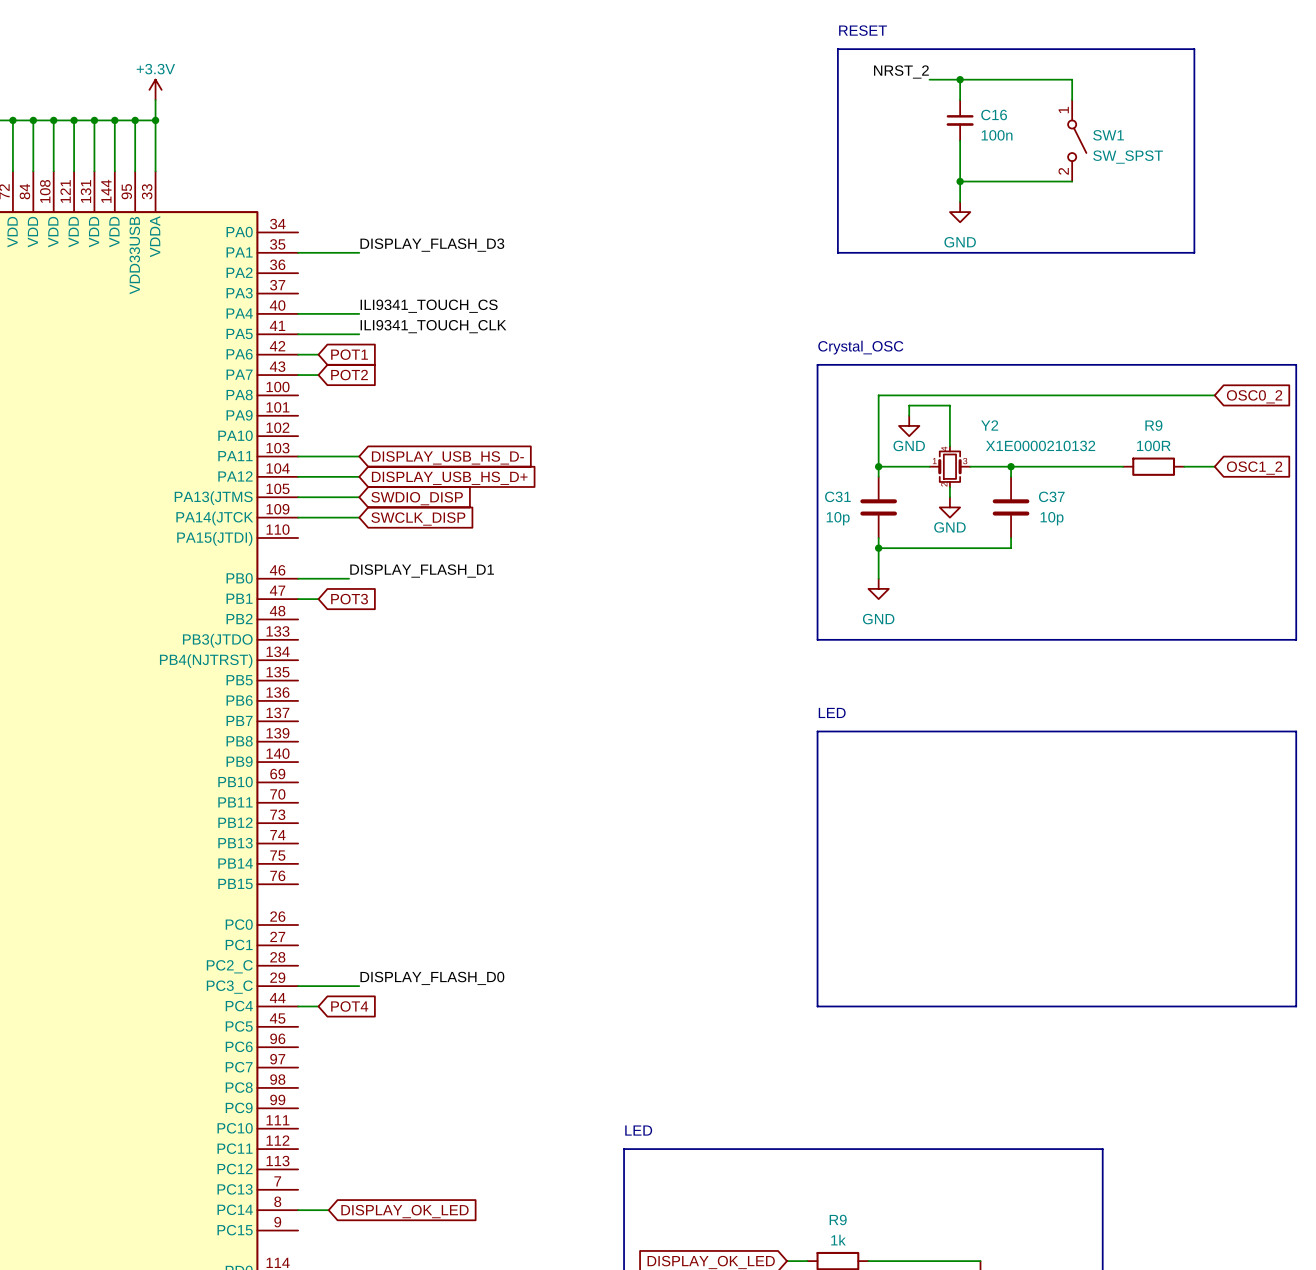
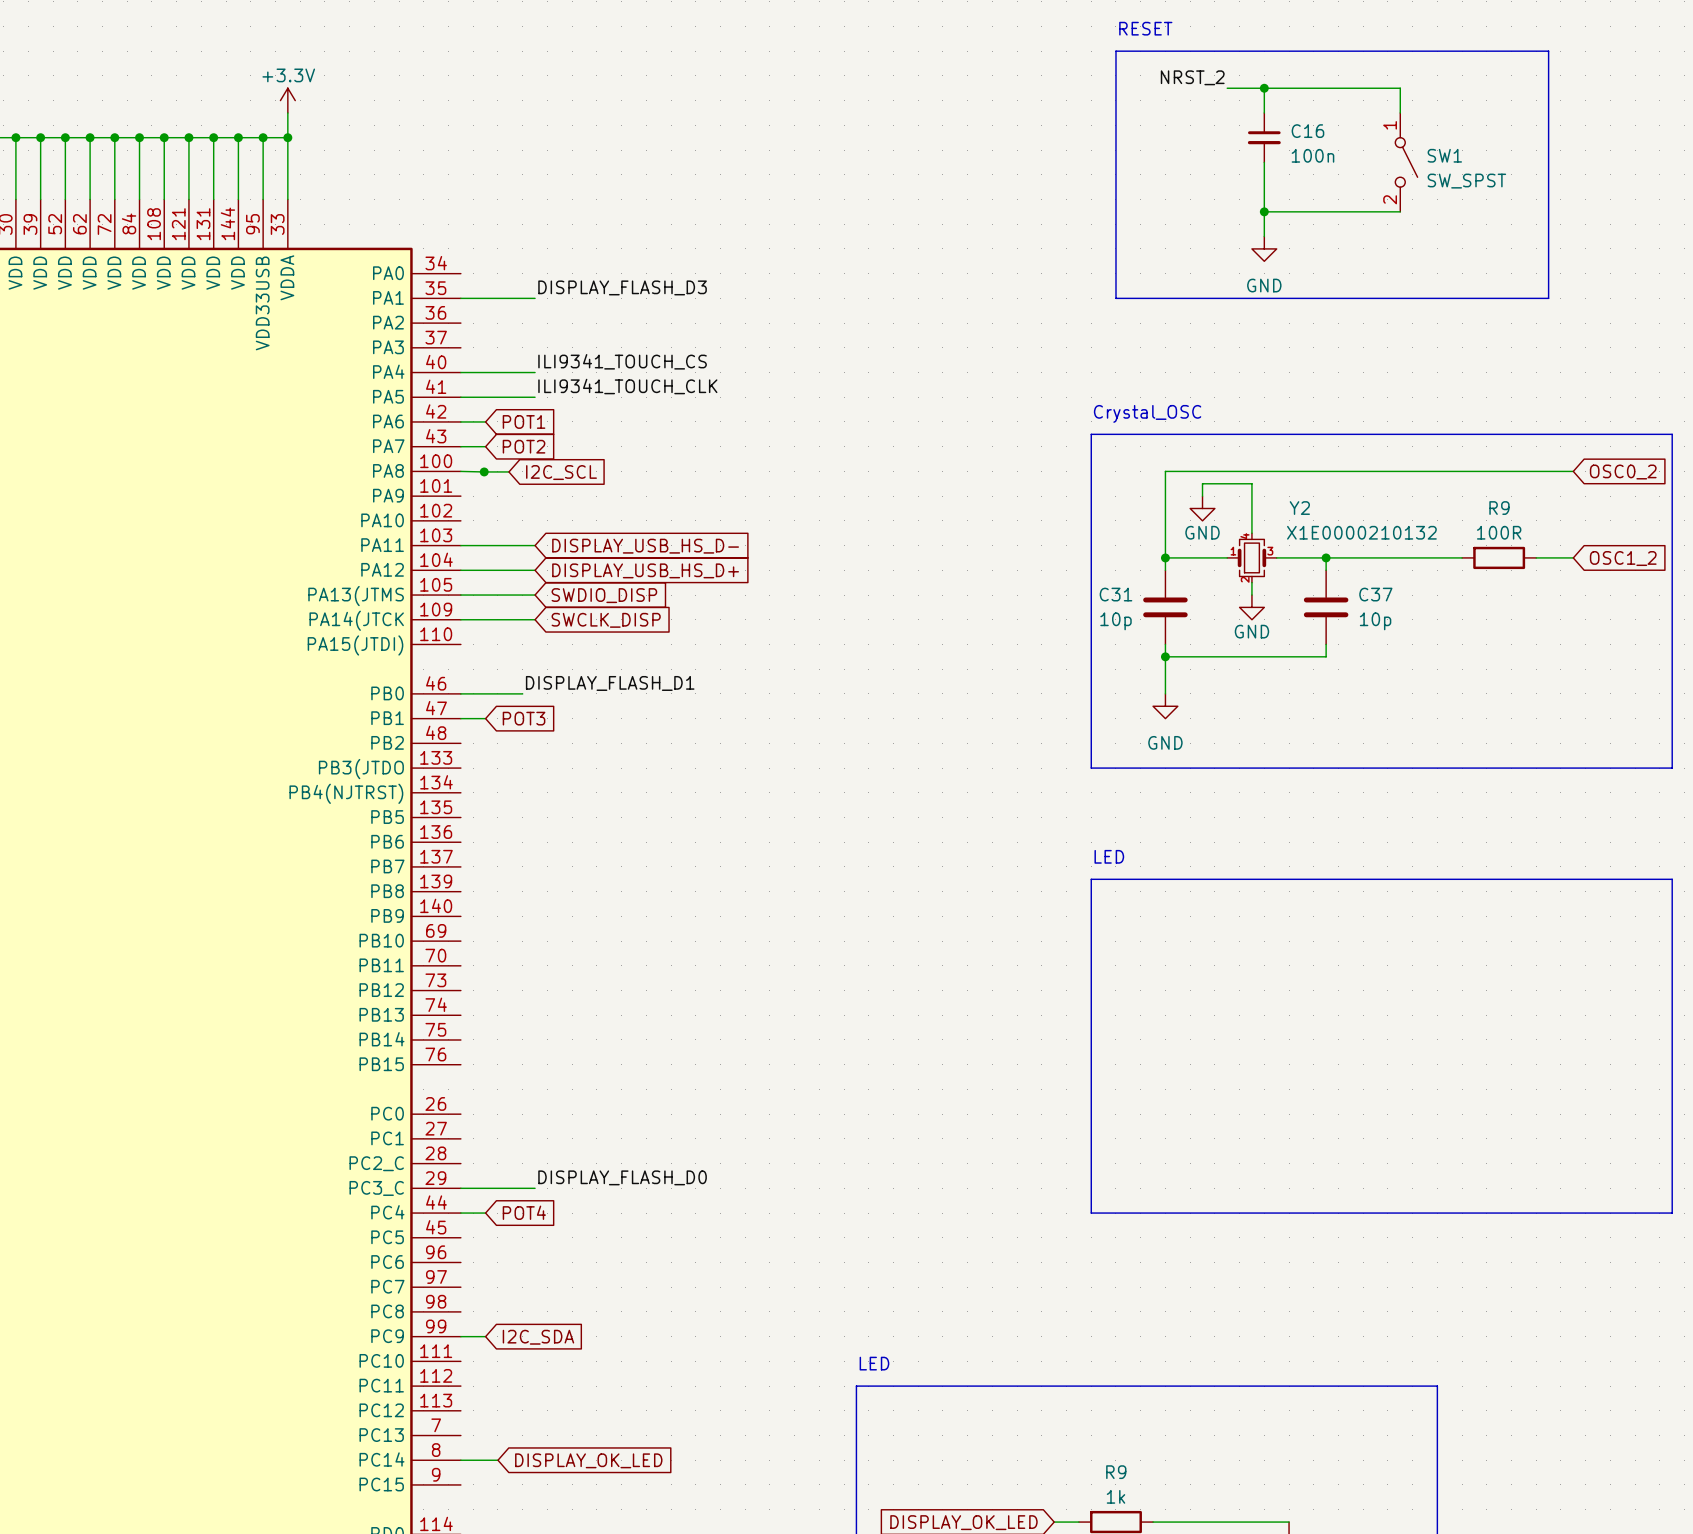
wire: none -> (460, 471) (484, 471)
wire: none -> (484, 471) (508, 471)
junction: none -> (484, 471)
global label: none -> I2C_SCL (561, 472)
wire: none -> (460, 1336) (485, 1336)
global label: none -> I2C_SDA (538, 1337)

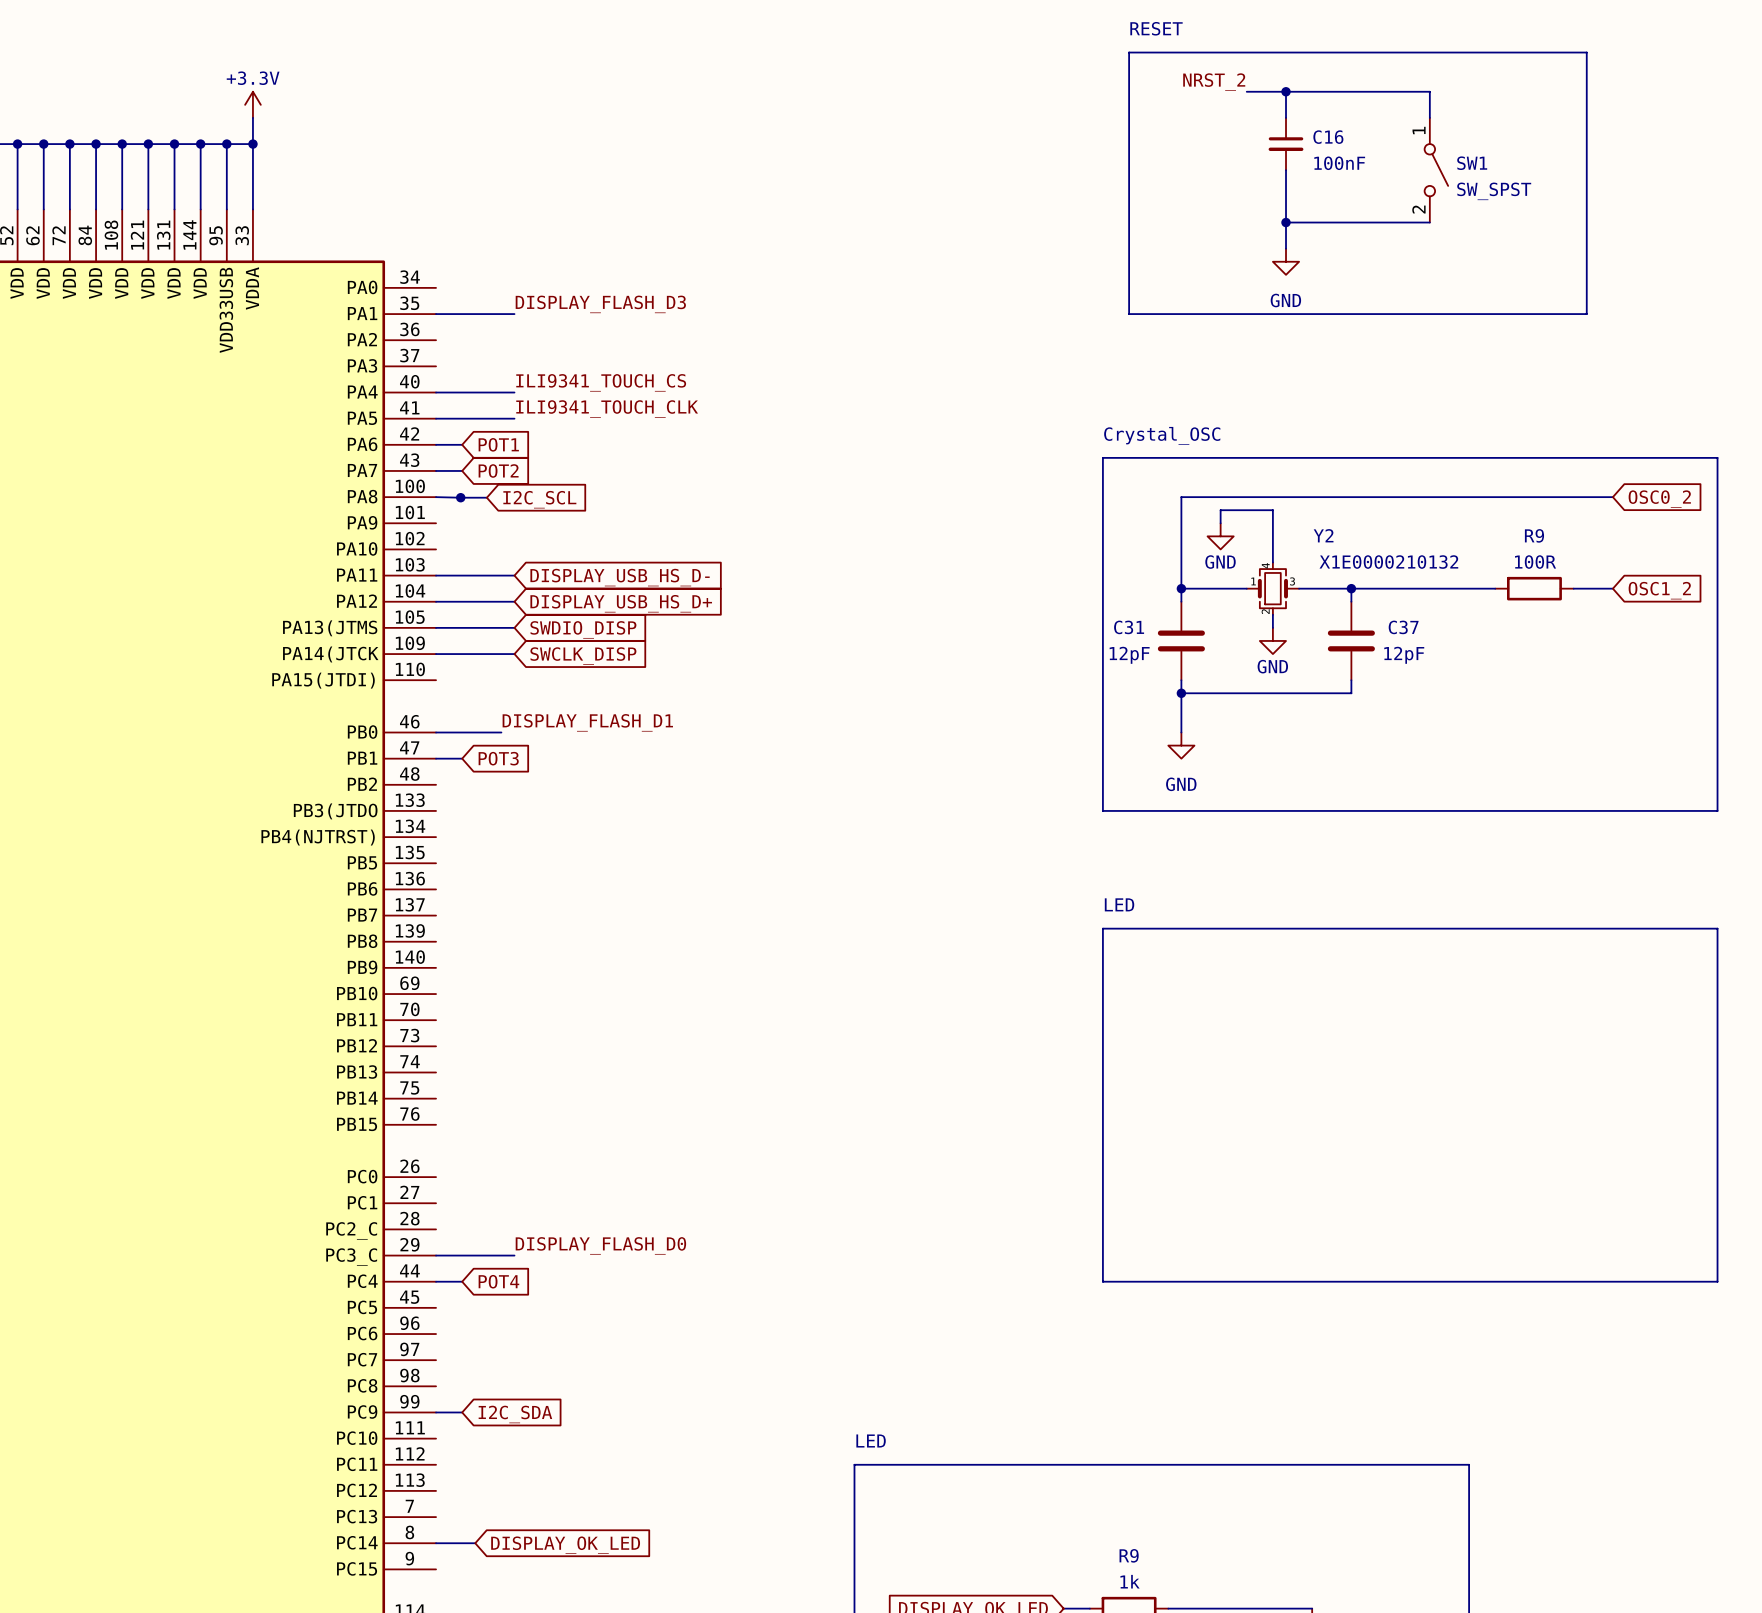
C16 value: 100n (1312, 155) -> 100nF (1339, 163)
C31 value: 10p (1115, 621) -> 12pF (1129, 655)
C37 value: 10p (1375, 621) -> 12pF (1404, 655)

